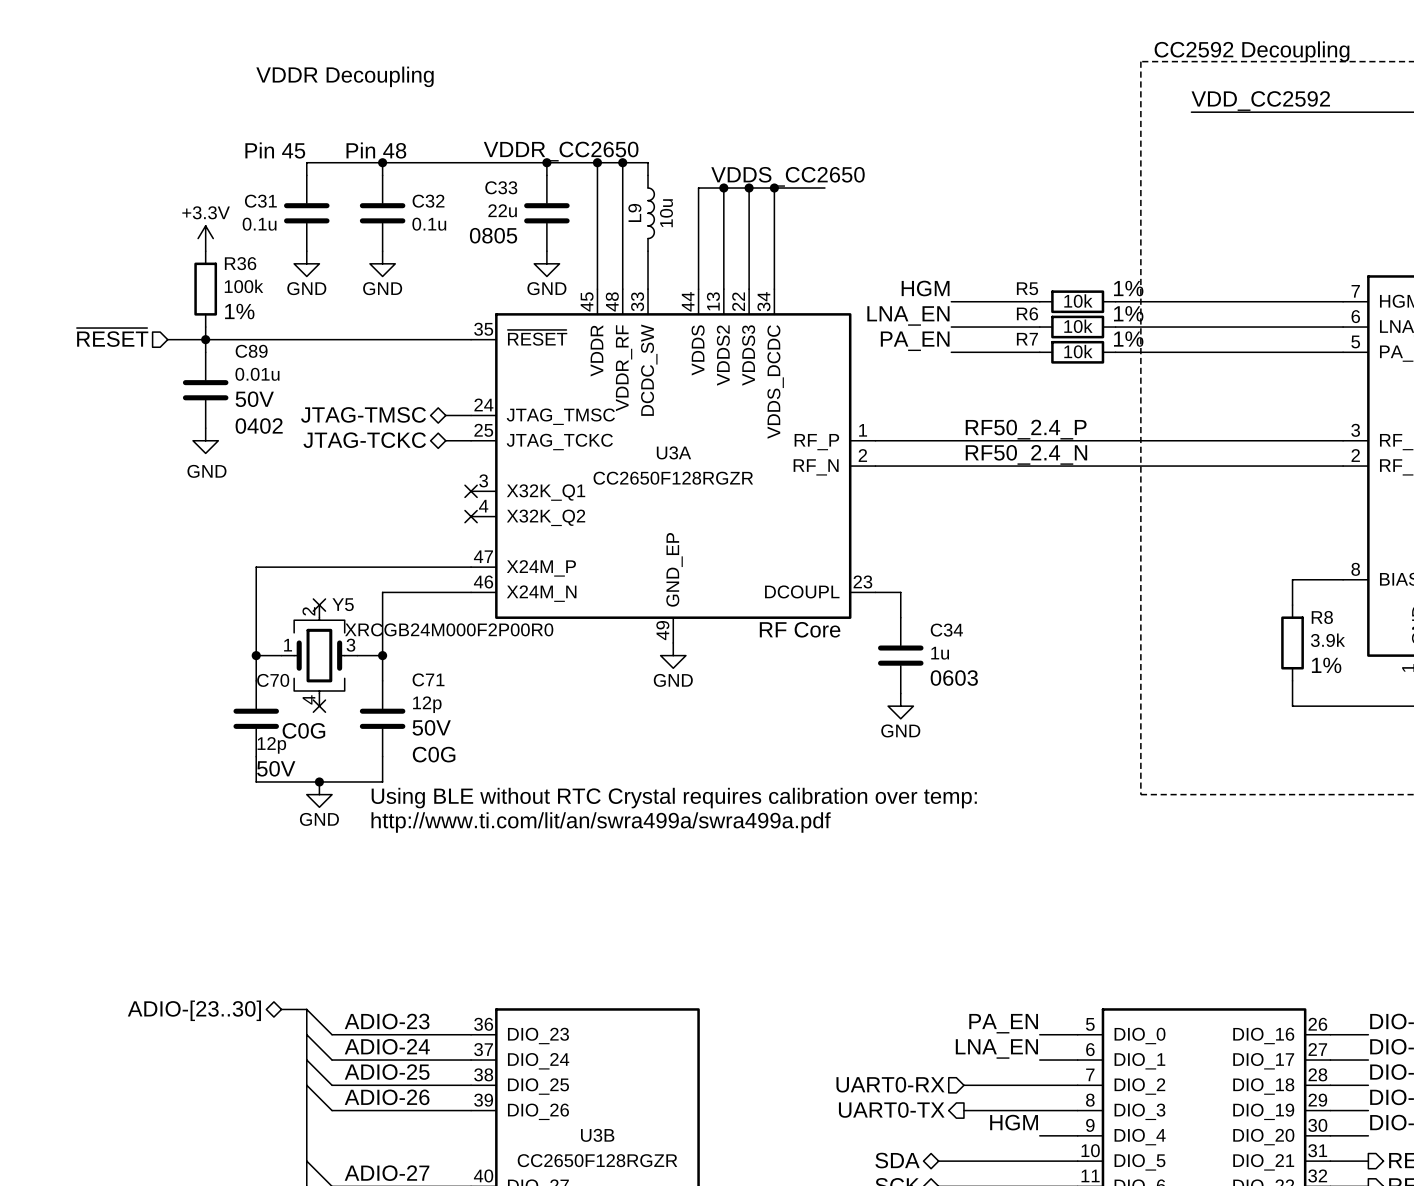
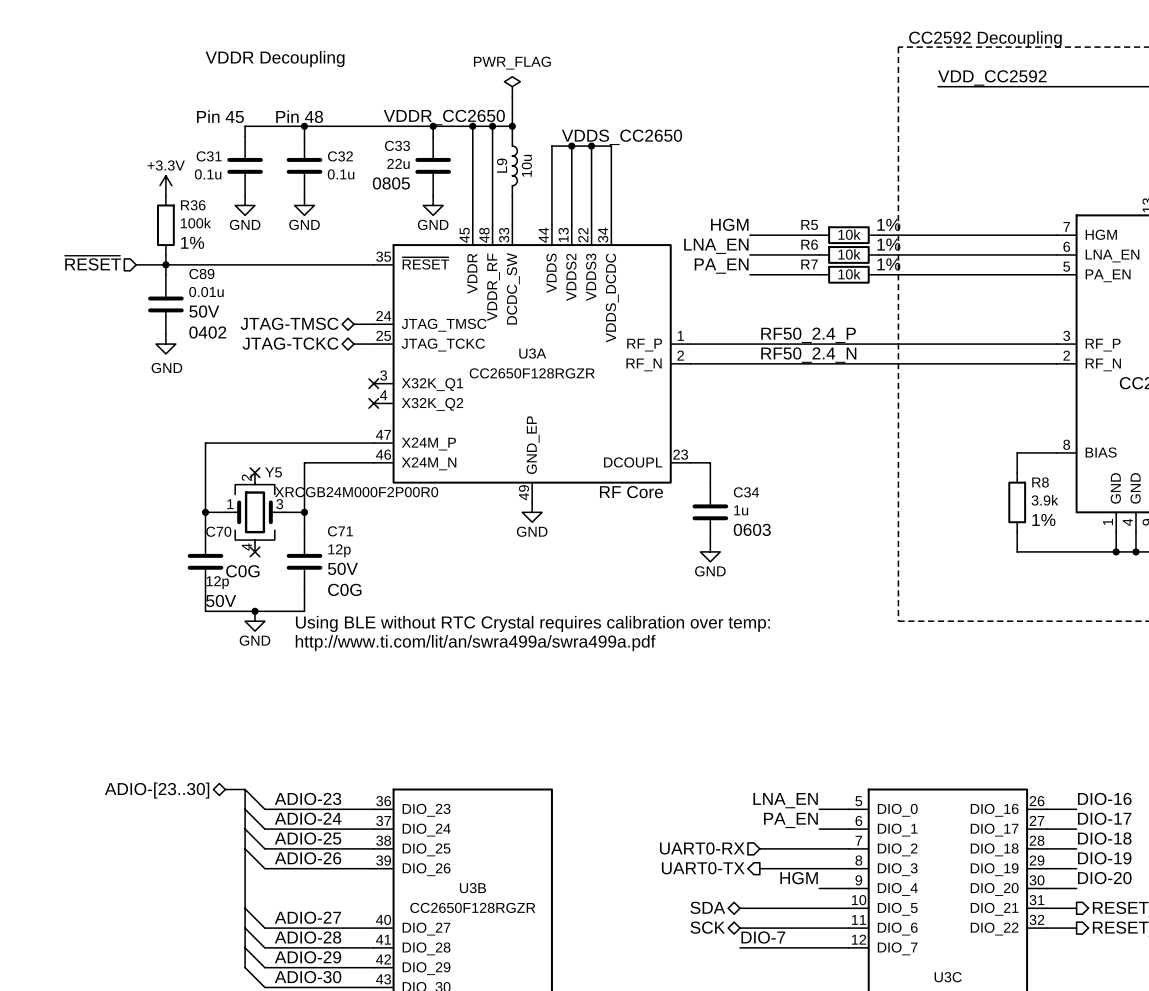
power symbol: none -> PWR_FLAG (512, 86)
wire: none -> (512, 96) (512, 126)
junction: none -> (512, 126)
wire: (774, 188) (824, 188) -> none
junction: (774, 188) -> none
label: PA_EN (1003, 1023) -> LNA_EN (785, 800)
label: LNA_EN (996, 1048) -> PA_EN (790, 820)

